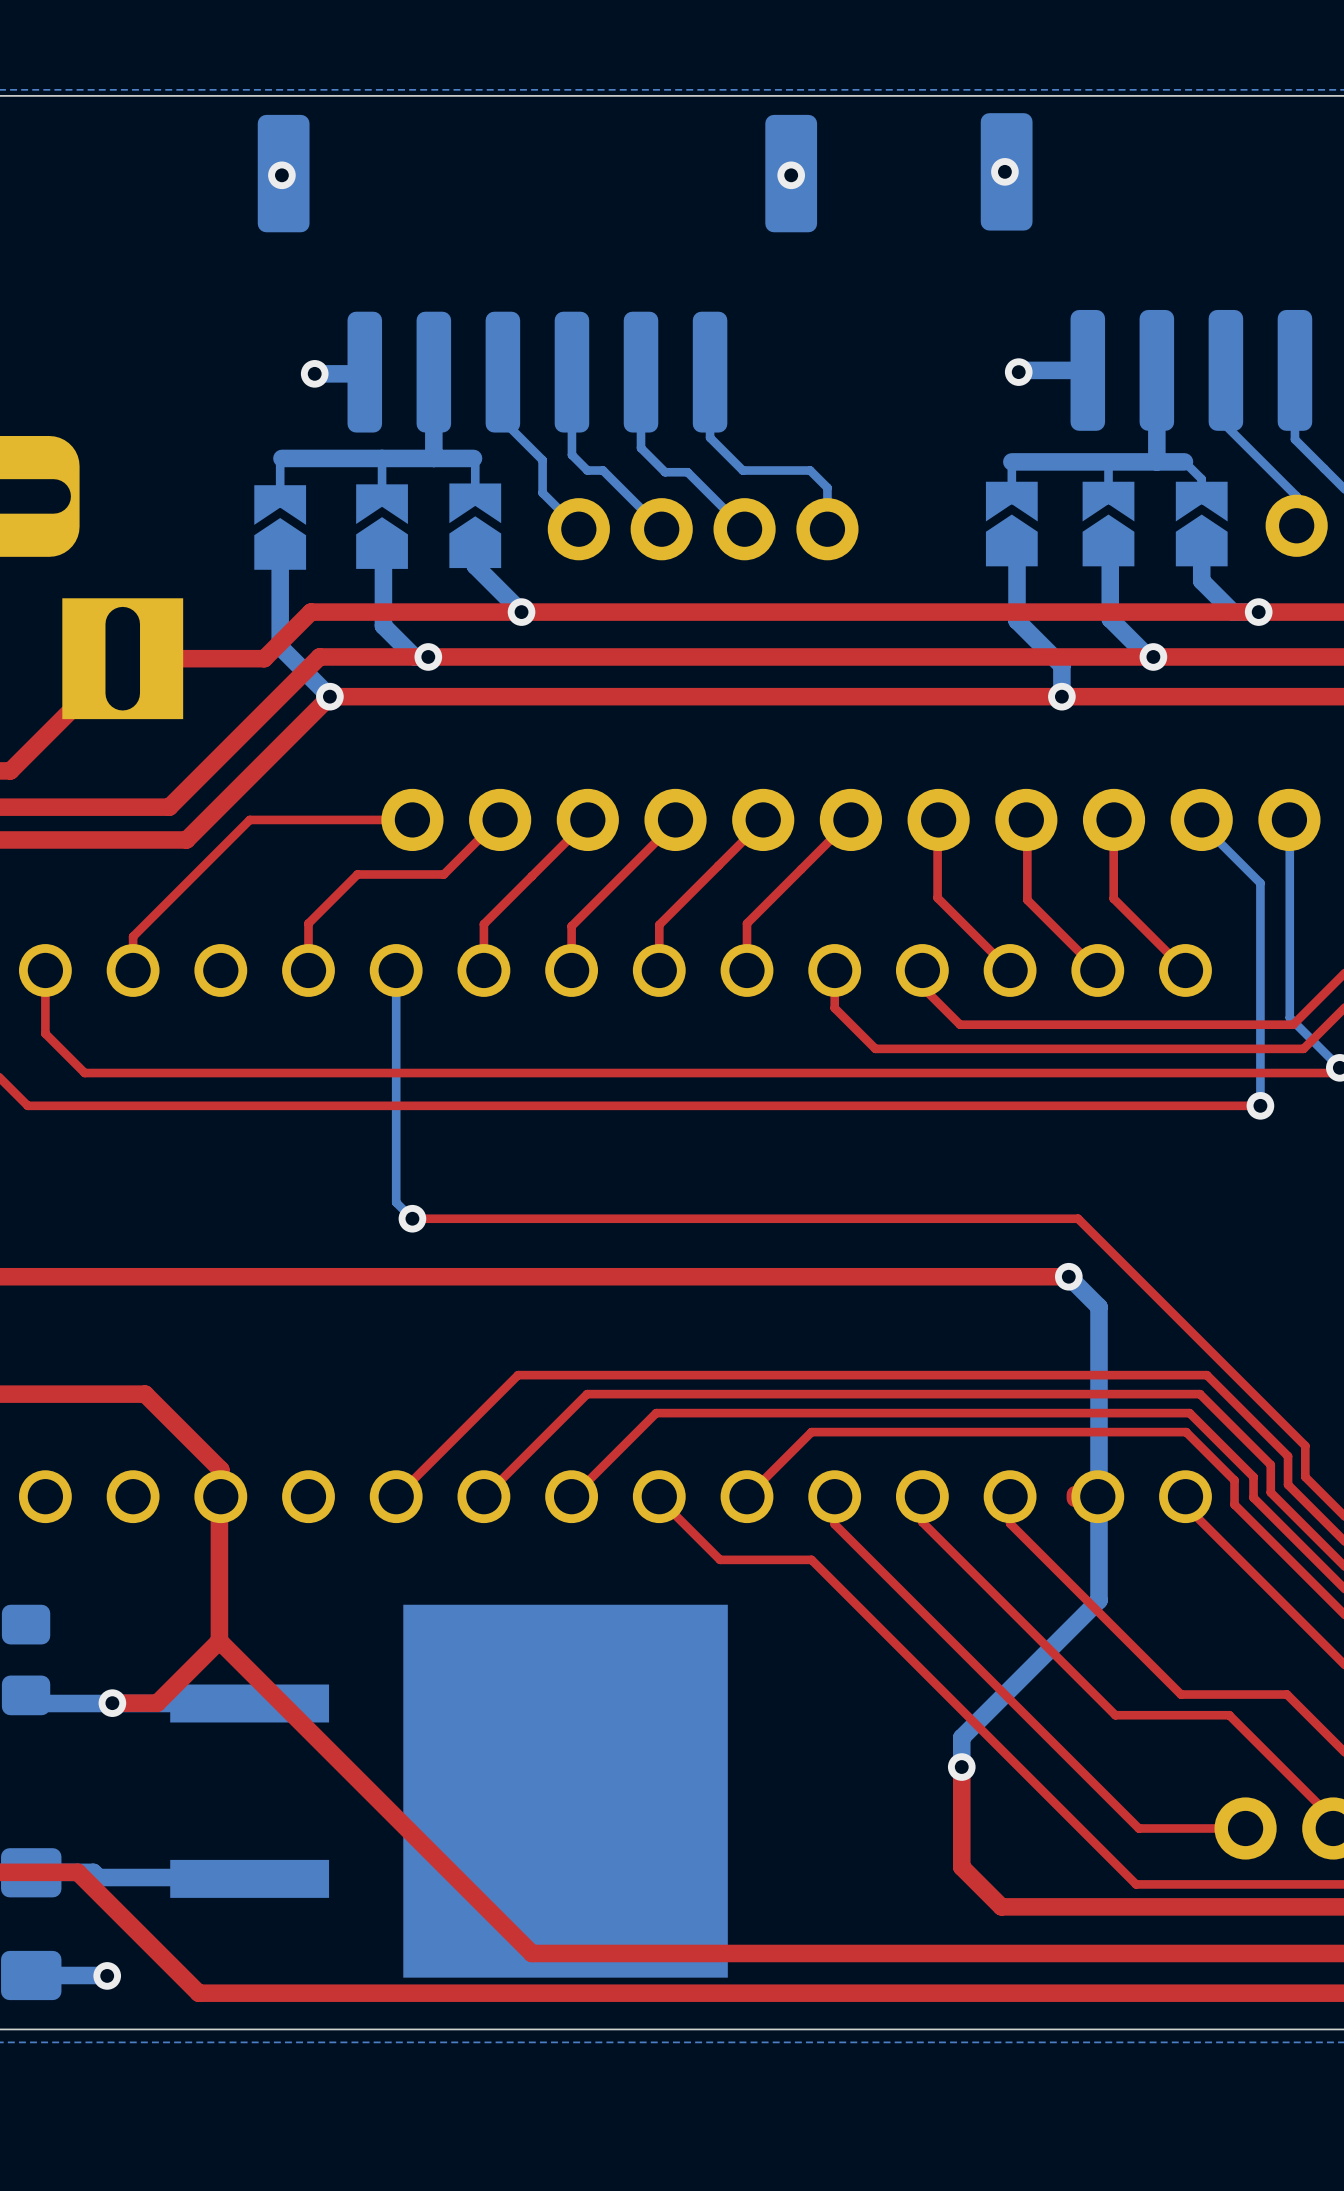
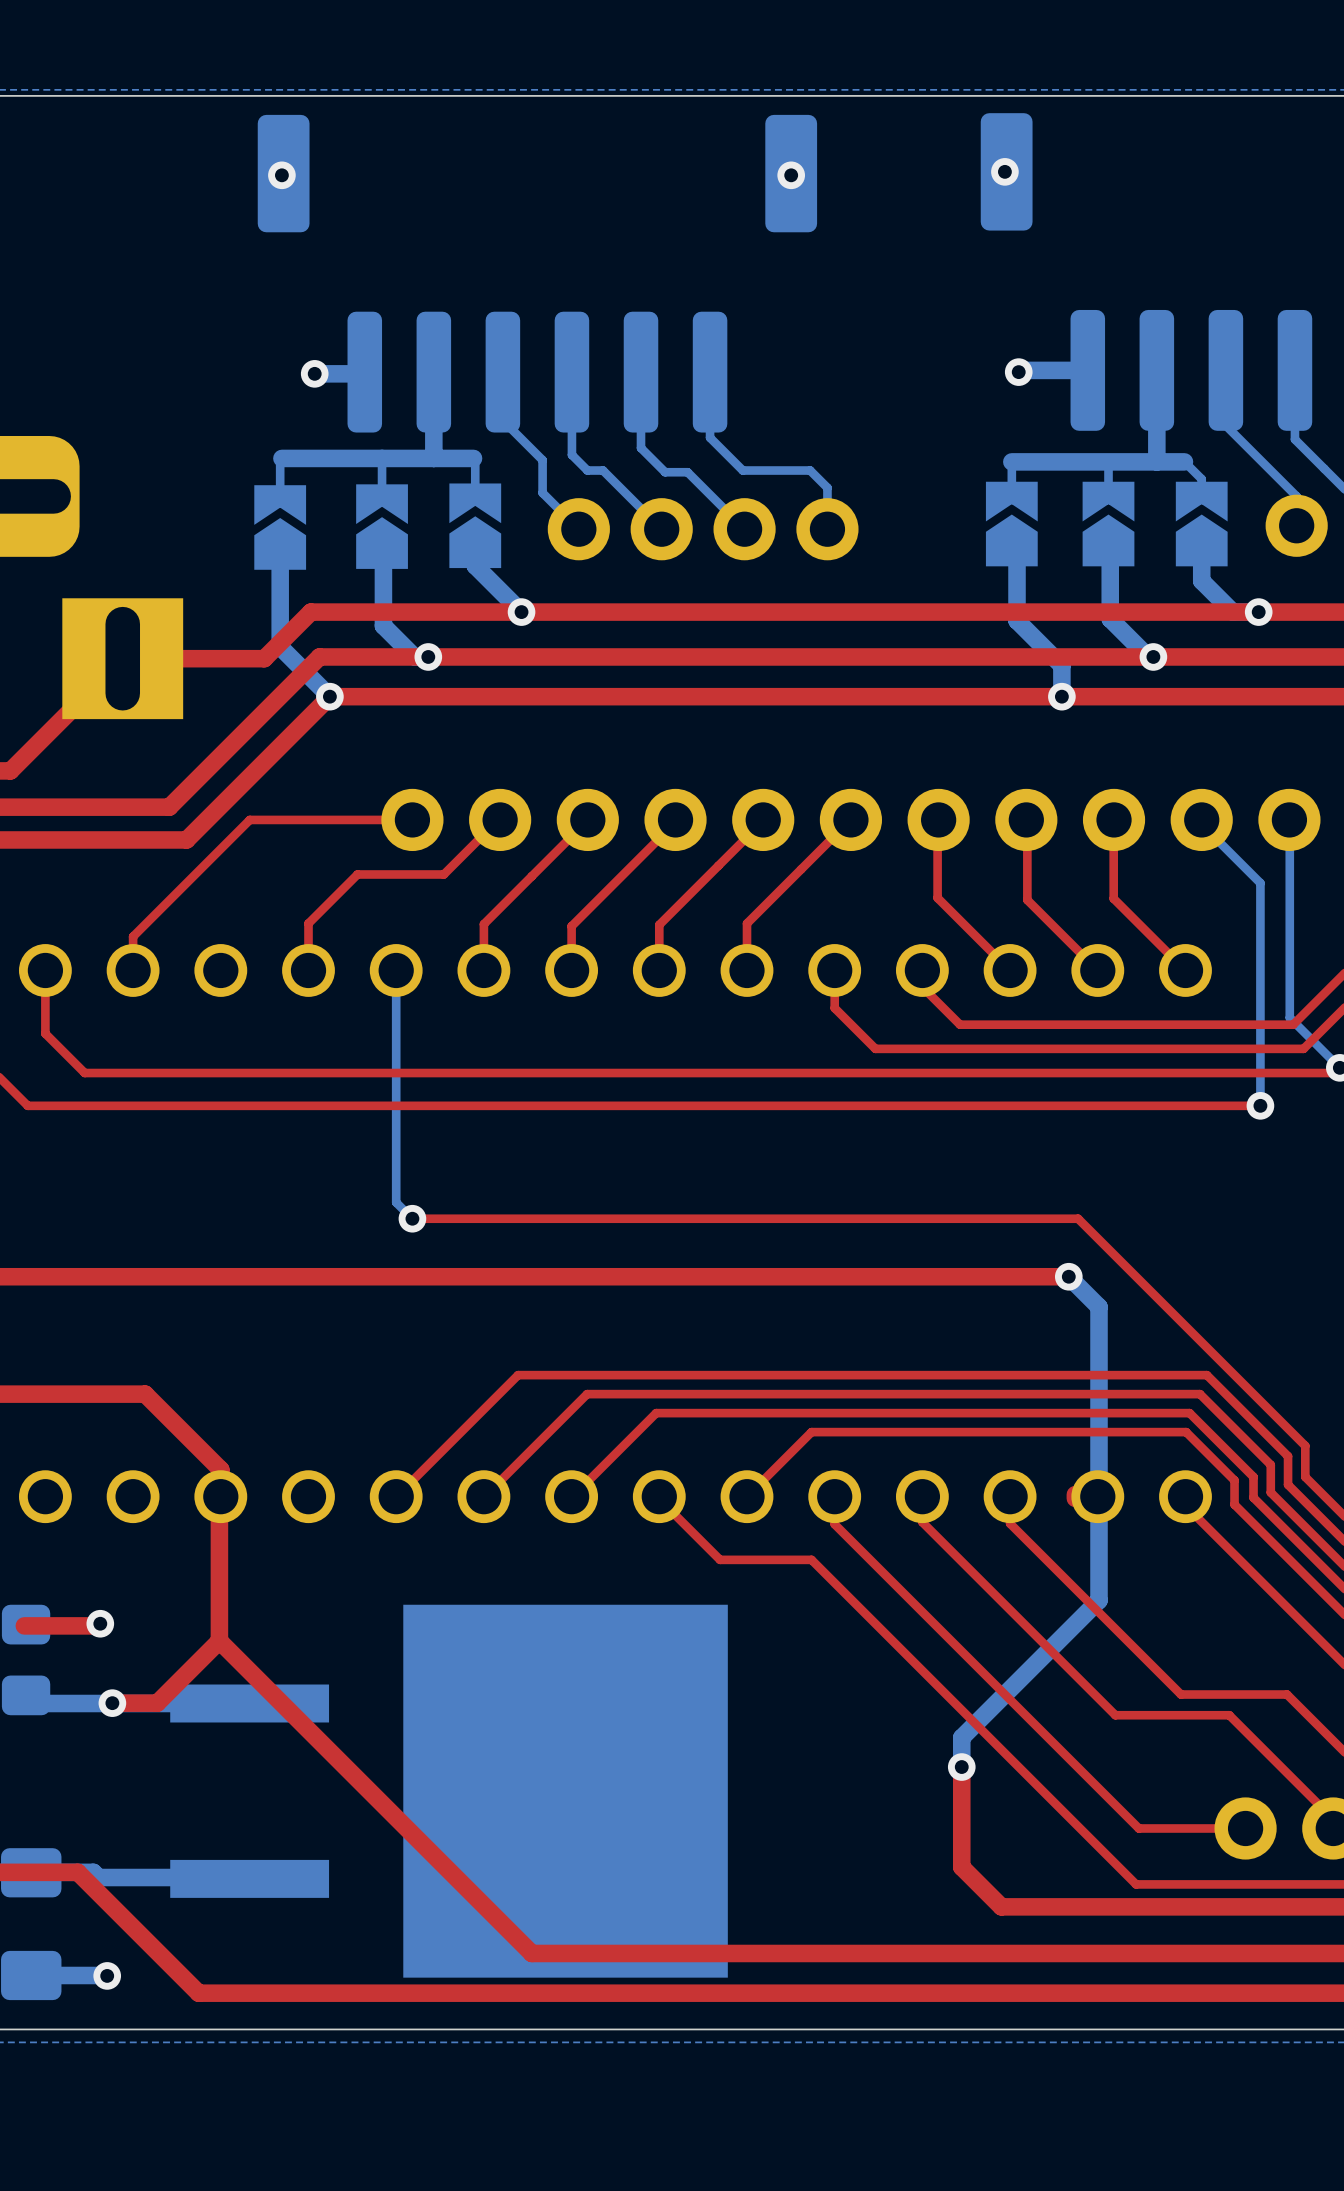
top track: none -> (100, 1623) (98, 1625) (24, 1625)
via: none -> (100, 1623)

